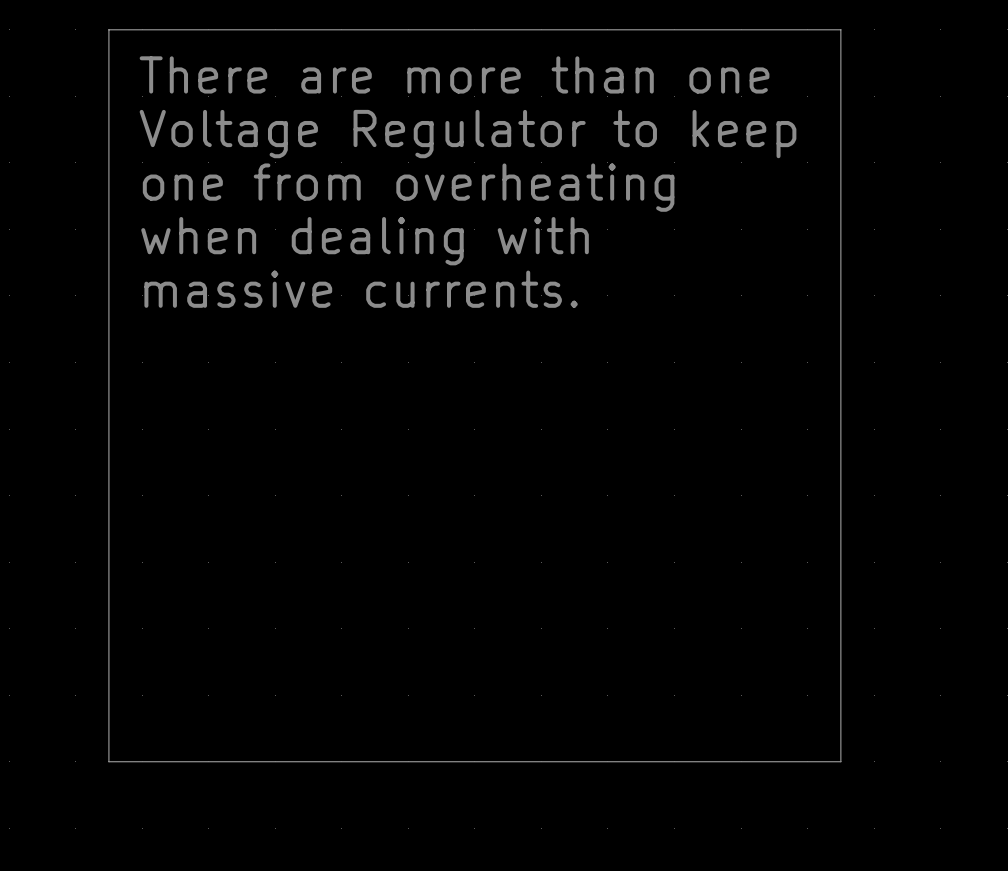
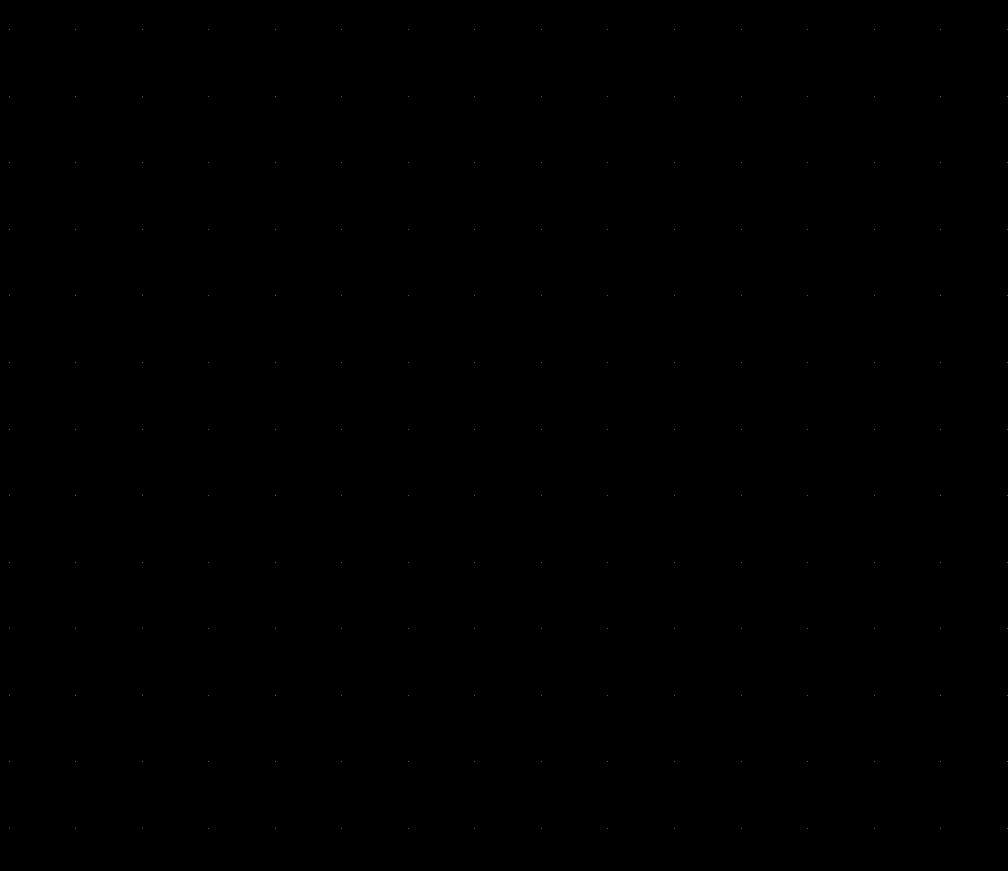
line: (108, 29) (840, 29) (840, 761) (108, 761) (108, 29) -> none
text: There are more than one (454, 74) -> none
text: Voltage Regulator to keep (468, 134) -> none
text: one from overheating (408, 187) -> none
text: when dealing with (365, 241) -> none
text: massive currents. (361, 289) -> none

